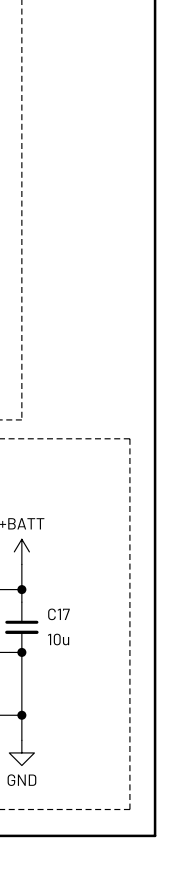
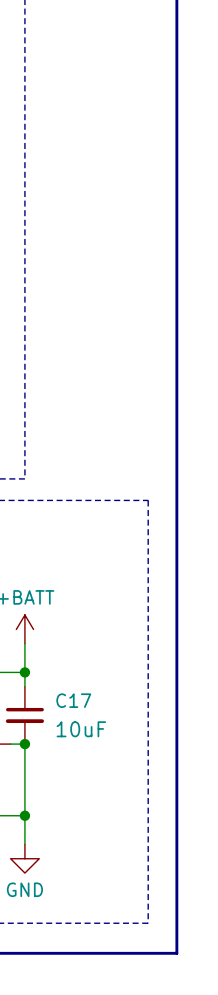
C17 value: 10u (58, 639) -> 10uF (81, 729)

